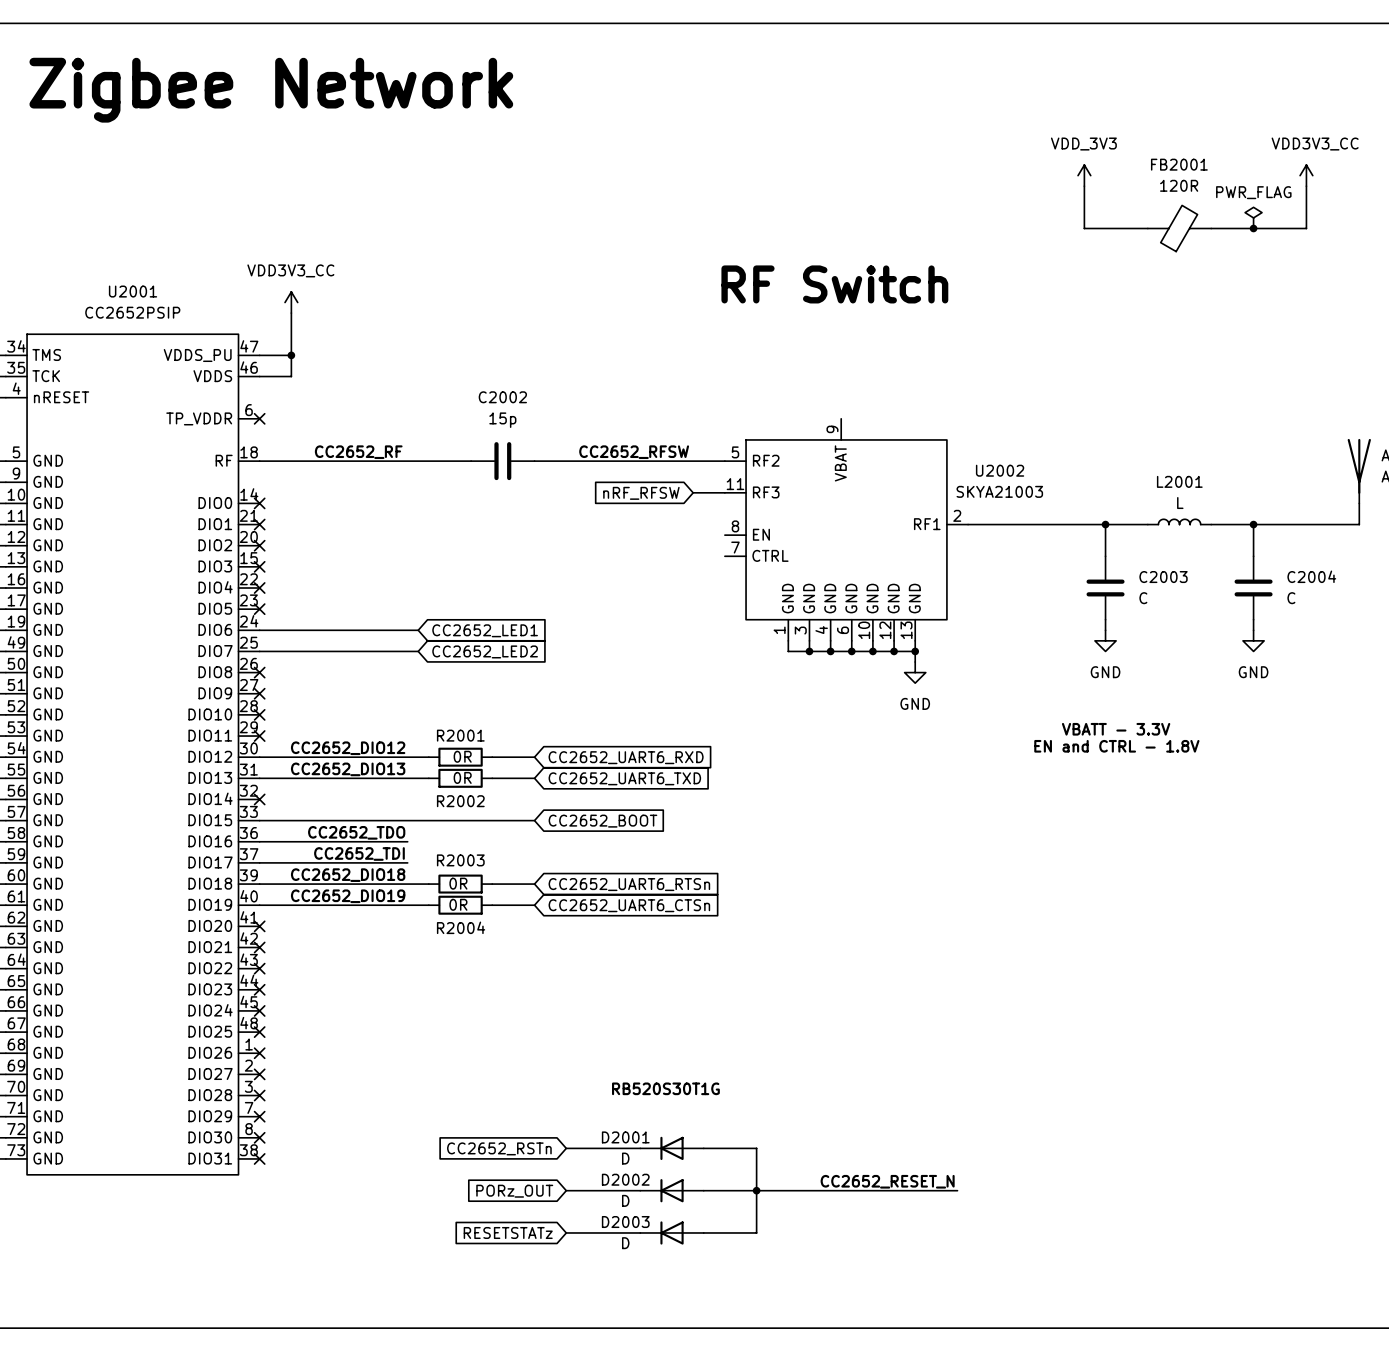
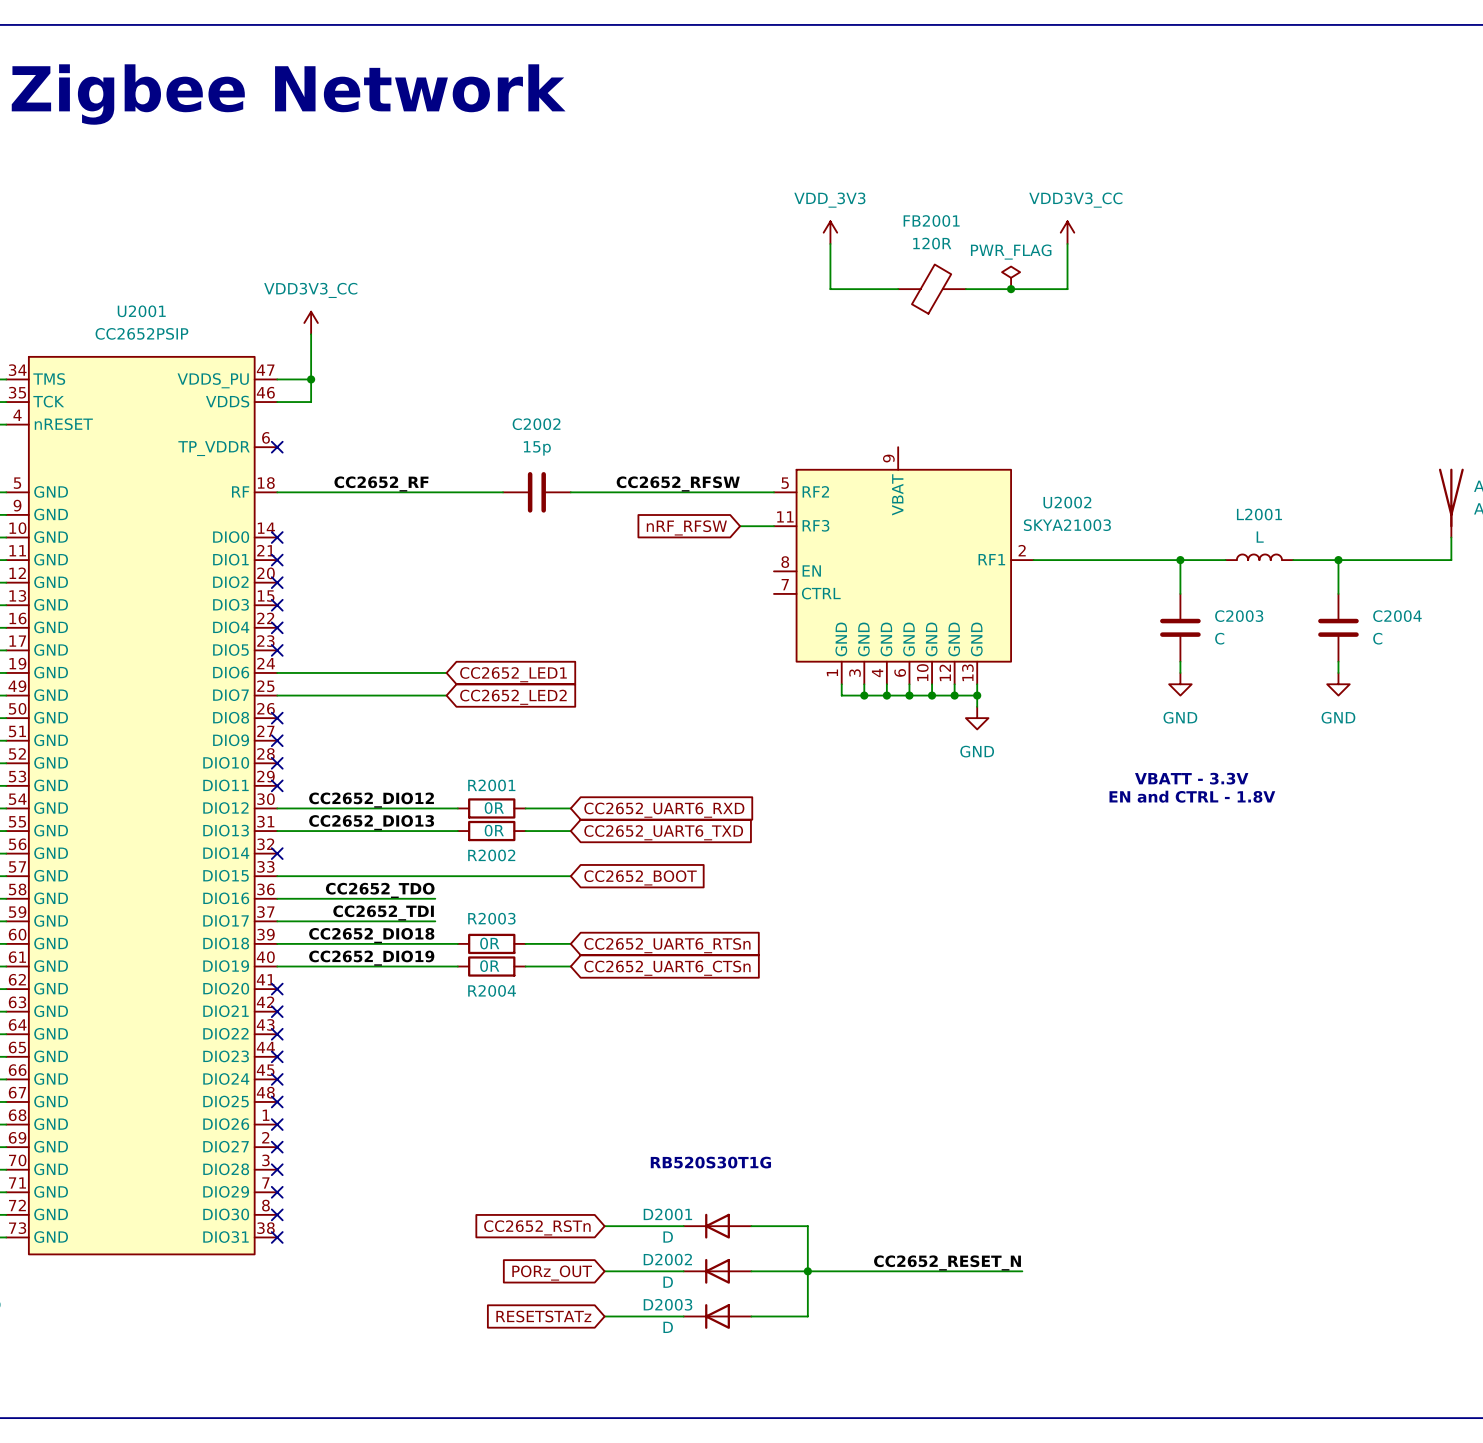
power symbol: VDD_3V3 (1084, 175) -> none
power symbol: VDD3V3_CC (1306, 175) -> none
wire: (1084, 186) (1084, 228) (1147, 228) -> none
wire: (1306, 186) (1306, 228) (1211, 228) -> none
power symbol: none -> VDD_3V3 (830, 232)
power symbol: none -> VDD3V3_CC (1067, 232)
power symbol: PWR_FLAG (1253, 217) -> none
wire: none -> (830, 243) (830, 289) (898, 289)
wire: none -> (1067, 243) (1067, 289) (965, 289)
FB2001 position: (1179, 228) -> (932, 289)
junction: (1253, 228) -> none
power symbol: none -> PWR_FLAG (1011, 277)
junction: none -> (1011, 289)
text: RF Switch (834, 284) -> none

